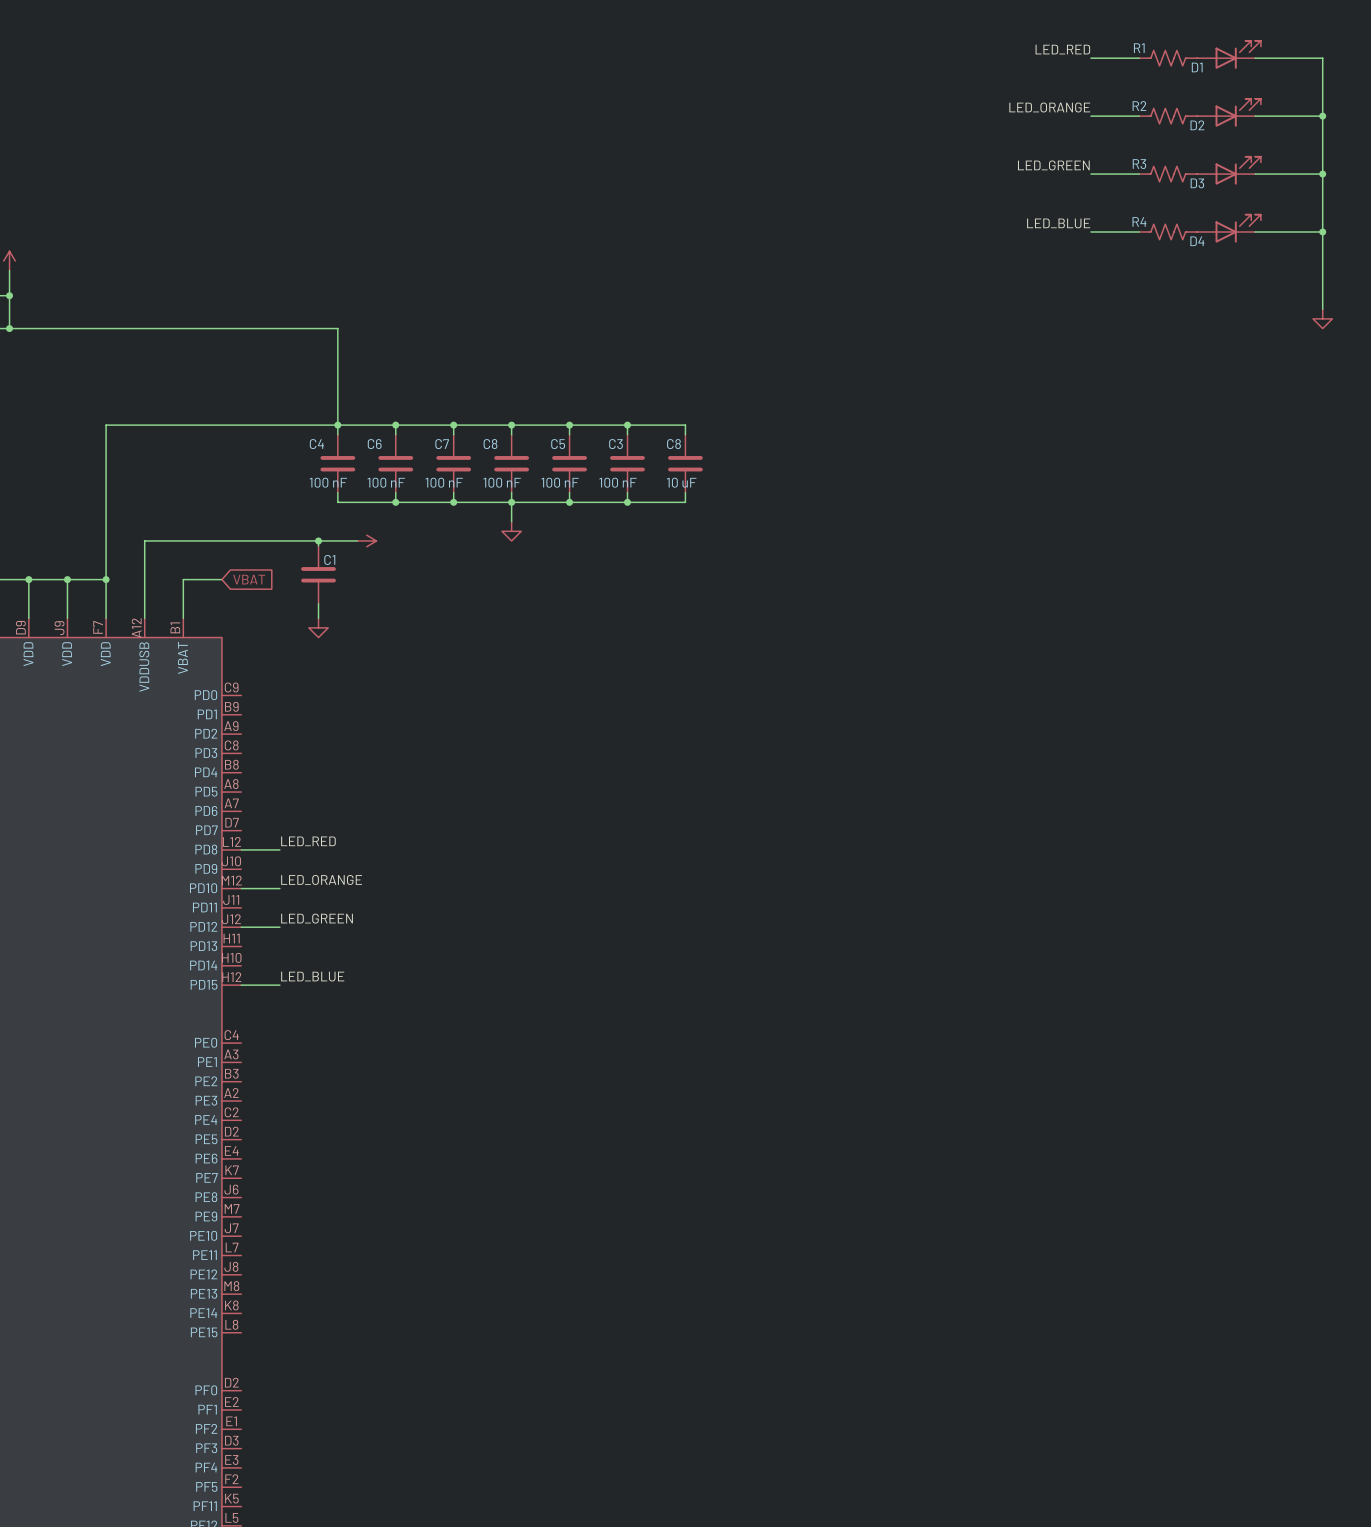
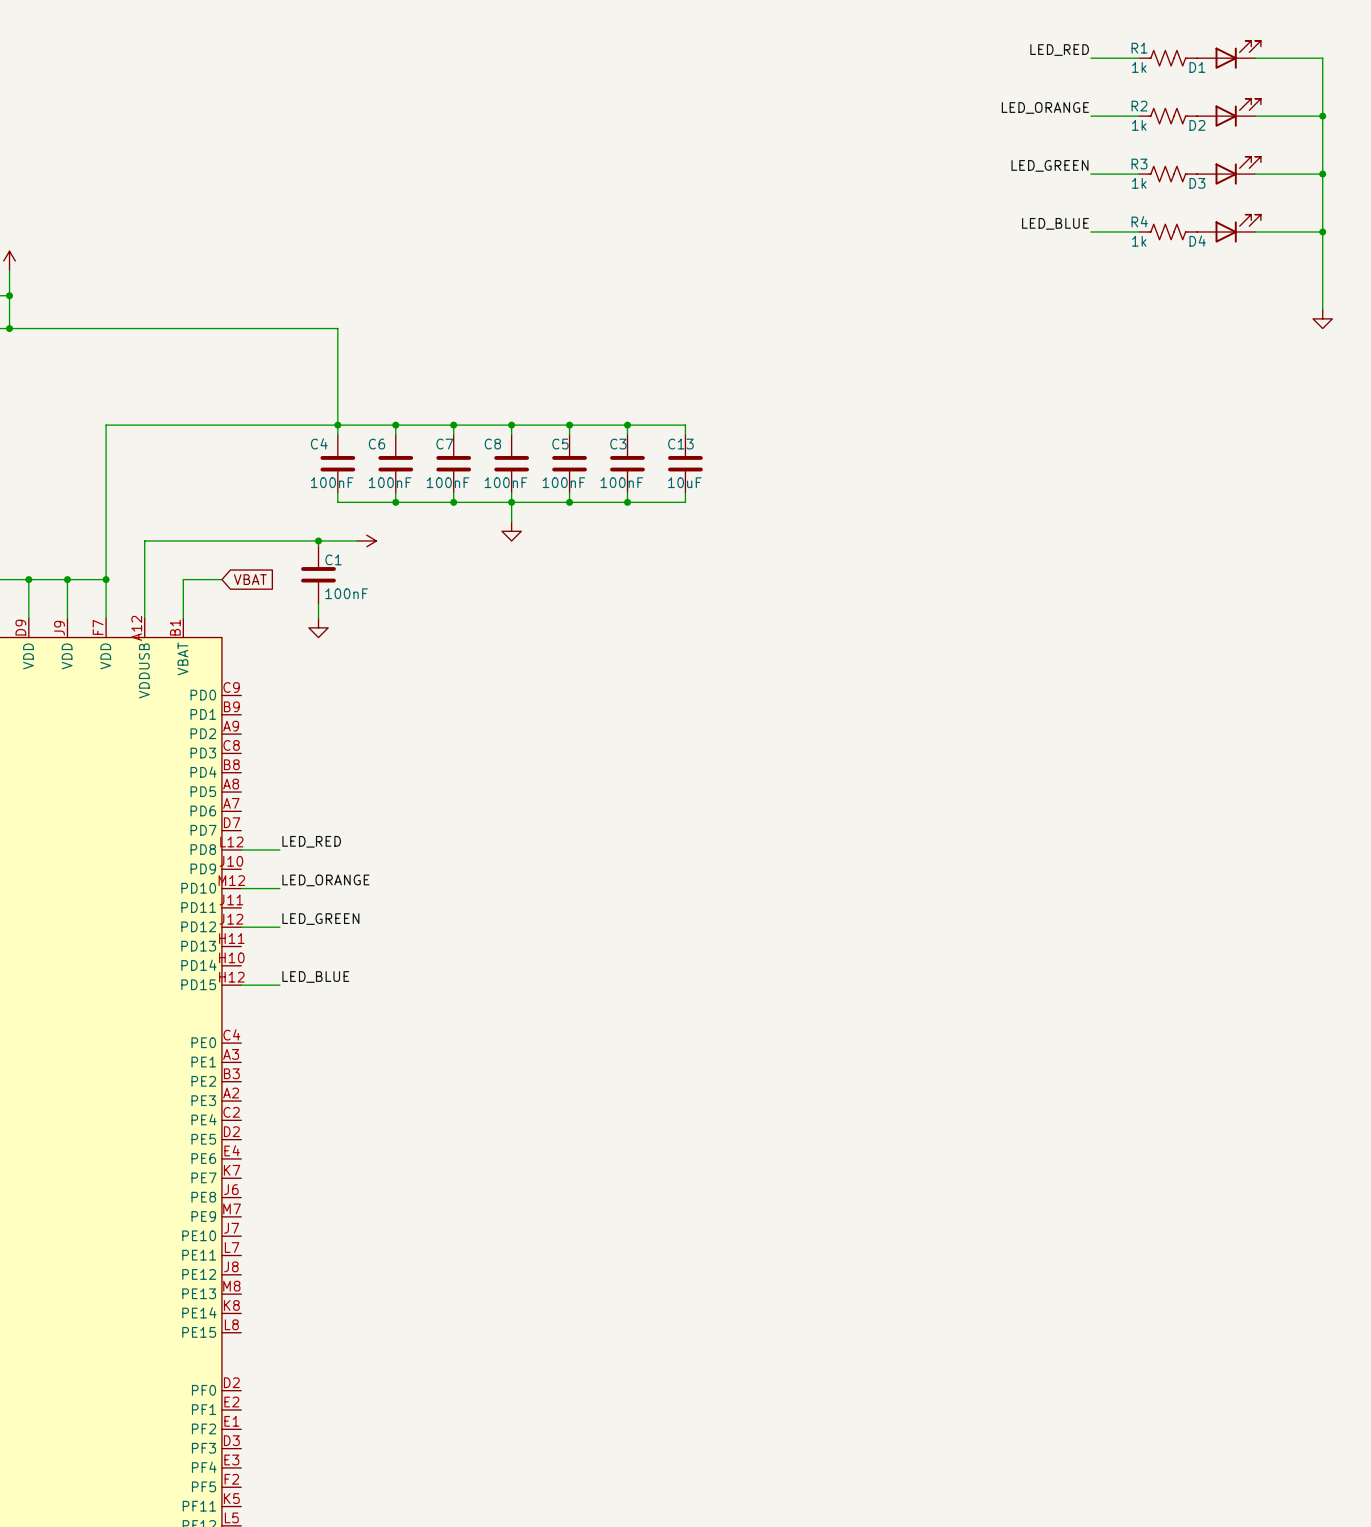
R1 value: none -> 1k (1139, 67)
R2 value: none -> 1k (1139, 125)
R3 value: none -> 1k (1139, 183)
R4 value: none -> 1k (1139, 241)
C8 name: C8 (673, 444) -> C13 (680, 444)
C4 value: 100 nF (328, 482) -> 100nF (332, 482)
C6 value: 100 nF (386, 482) -> 100nF (390, 482)
C7 value: 100 nF (444, 482) -> 100nF (448, 482)
C8 value: 100 nF (502, 482) -> 100nF (505, 482)
C5 value: 100 nF (560, 482) -> 100nF (563, 482)
C3 value: 100 nF (618, 482) -> 100nF (621, 482)
C8 value: 10 uF (681, 482) -> 10uF (684, 482)
C1 value: none -> 100nF (346, 593)

